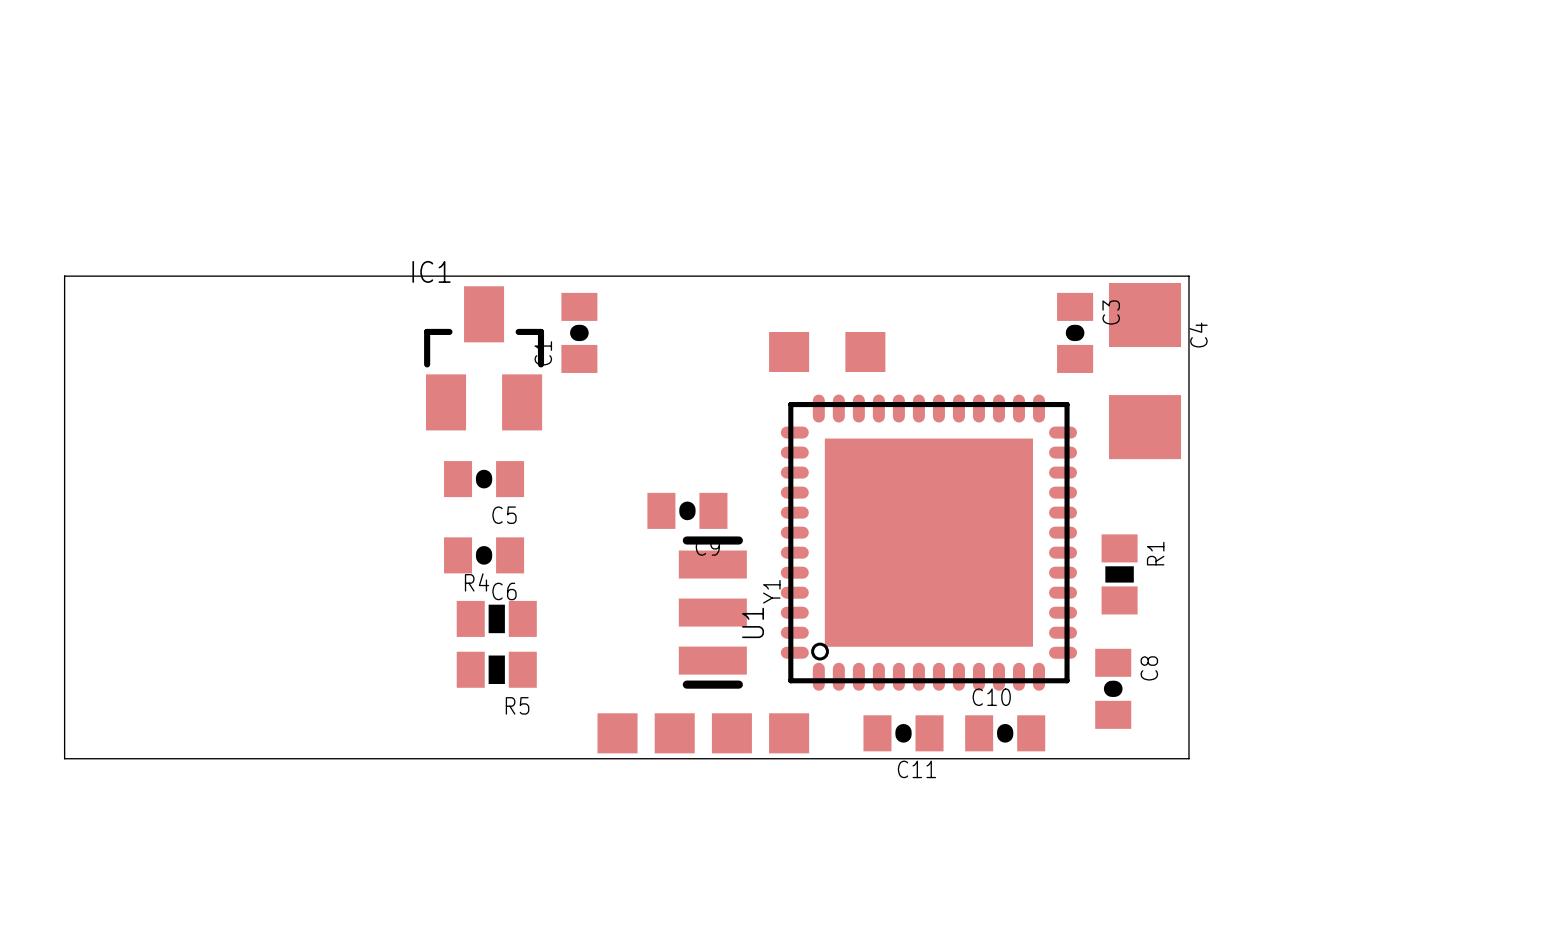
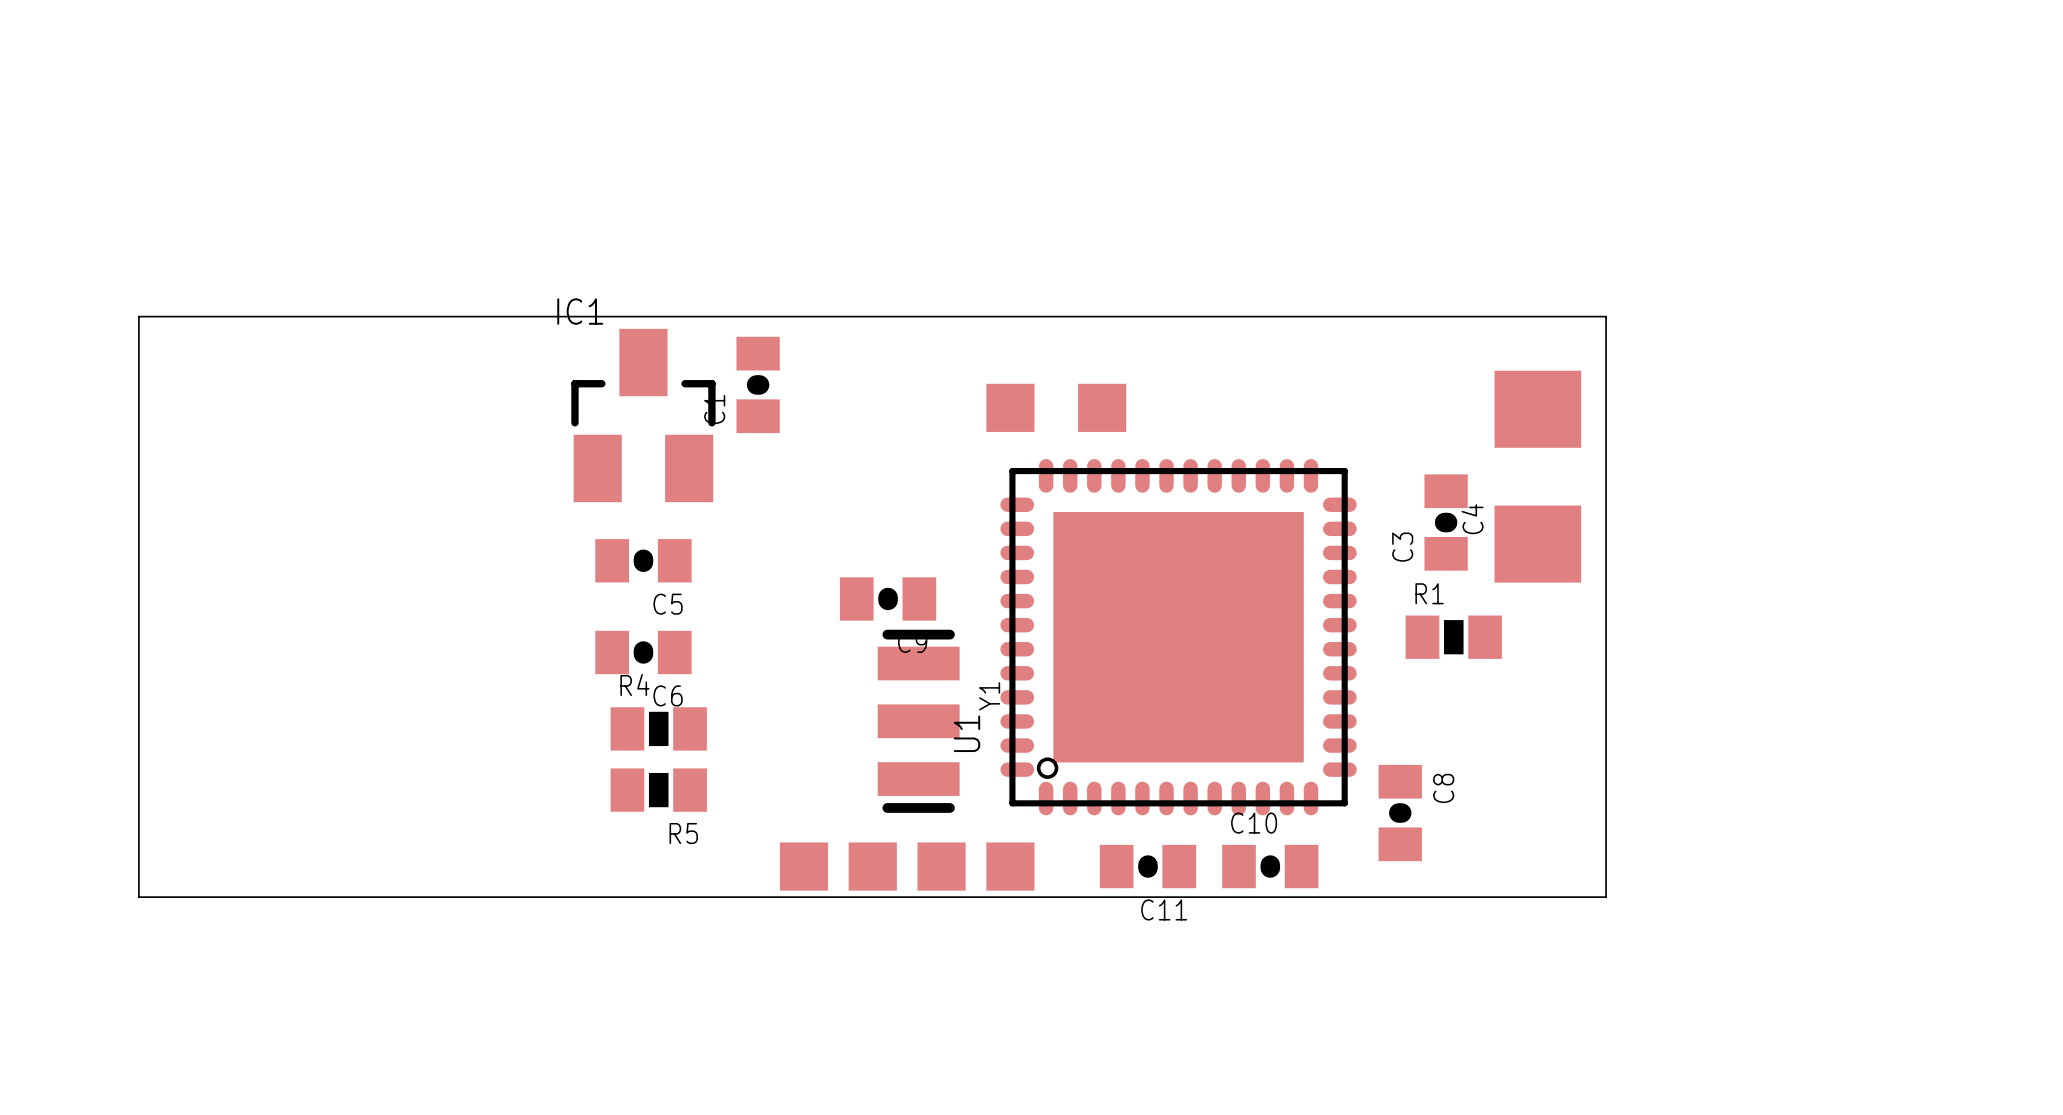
board edge: (1188, 276) (1188, 758) -> (1491, 316) (1606, 316) (1606, 897) (1491, 897)
C3 name position: C3 (1111, 312) -> C3 (1402, 547)
C3 position: (1075, 332) -> (1446, 522)
C4 name position: C4 (1198, 335) -> C4 (1472, 519)
C4 position: (1145, 371) -> (1537, 476)
R1 rotation: 0° (1119, 574) -> 90° clockwise (1453, 637)
R1 position: (1119, 574) -> (1453, 637)

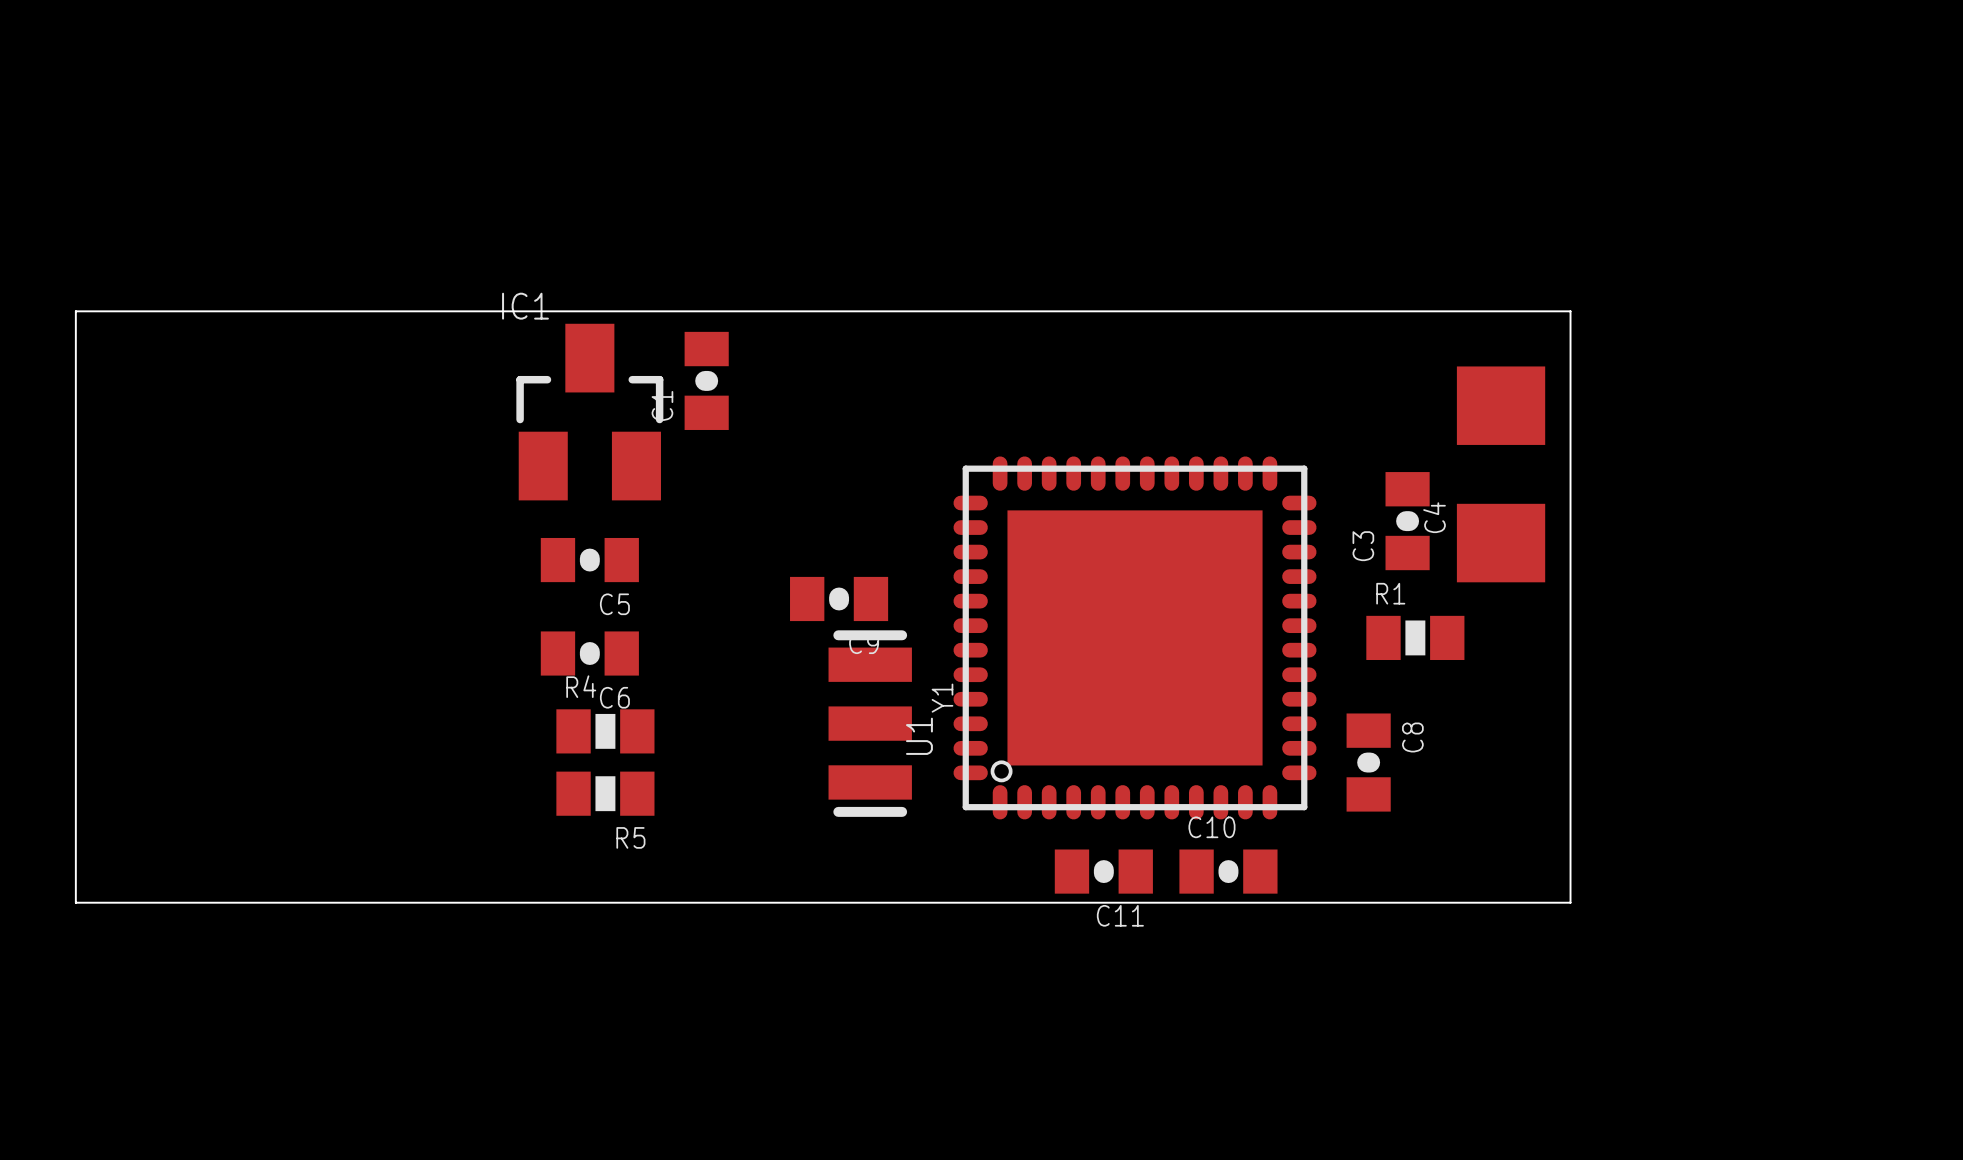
part: (1010, 407) -> none
part: (1102, 407) -> none
C8 position: (1400, 813) -> (1368, 762)
part: (803, 866) -> none
part: (872, 866) -> none
part: (941, 866) -> none
part: (1010, 866) -> none

